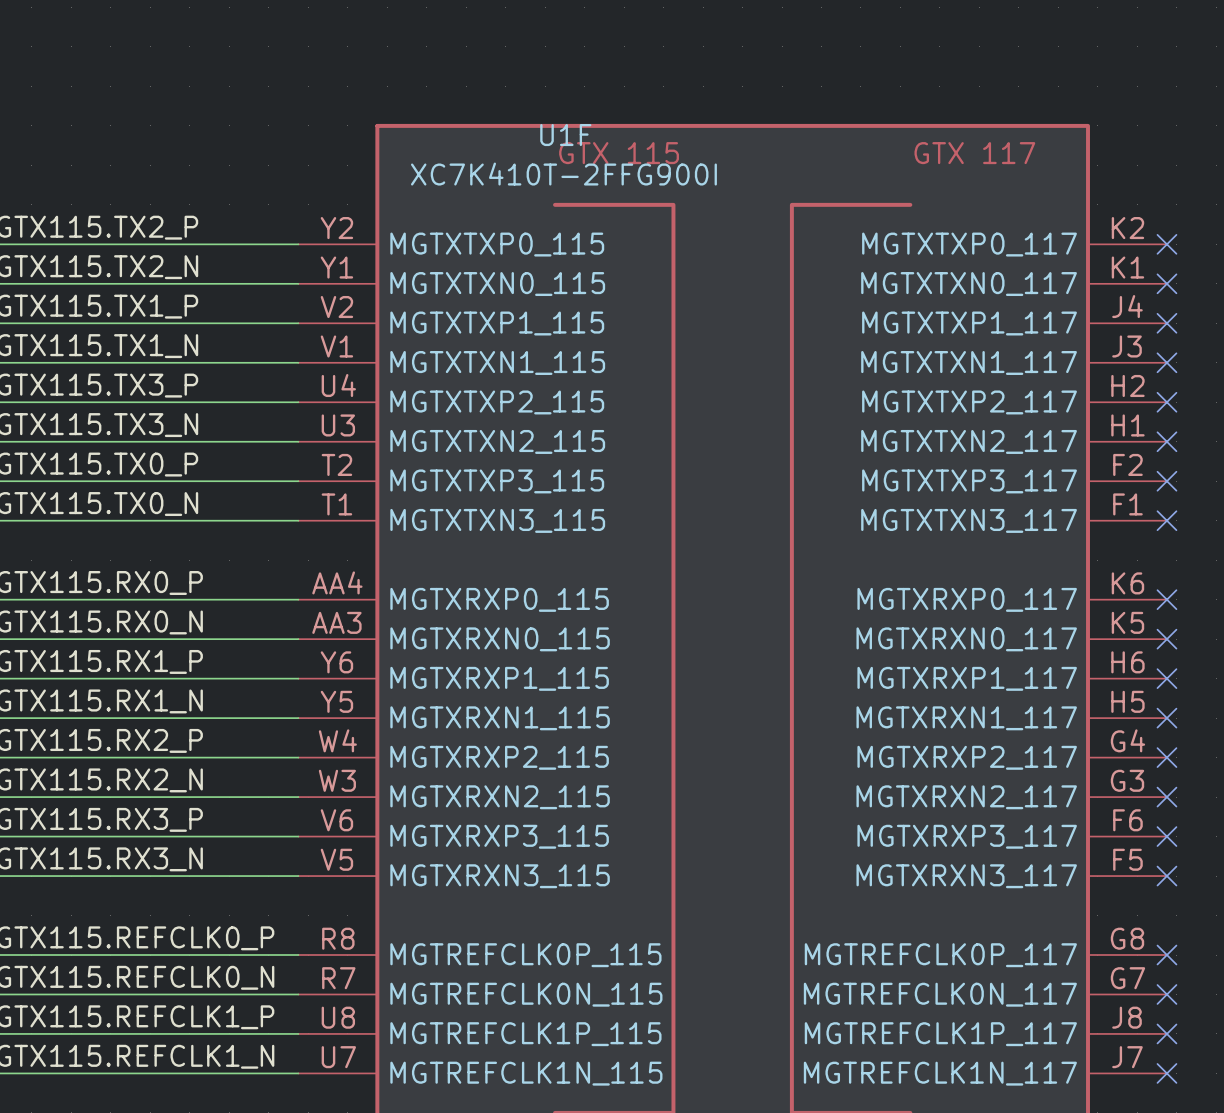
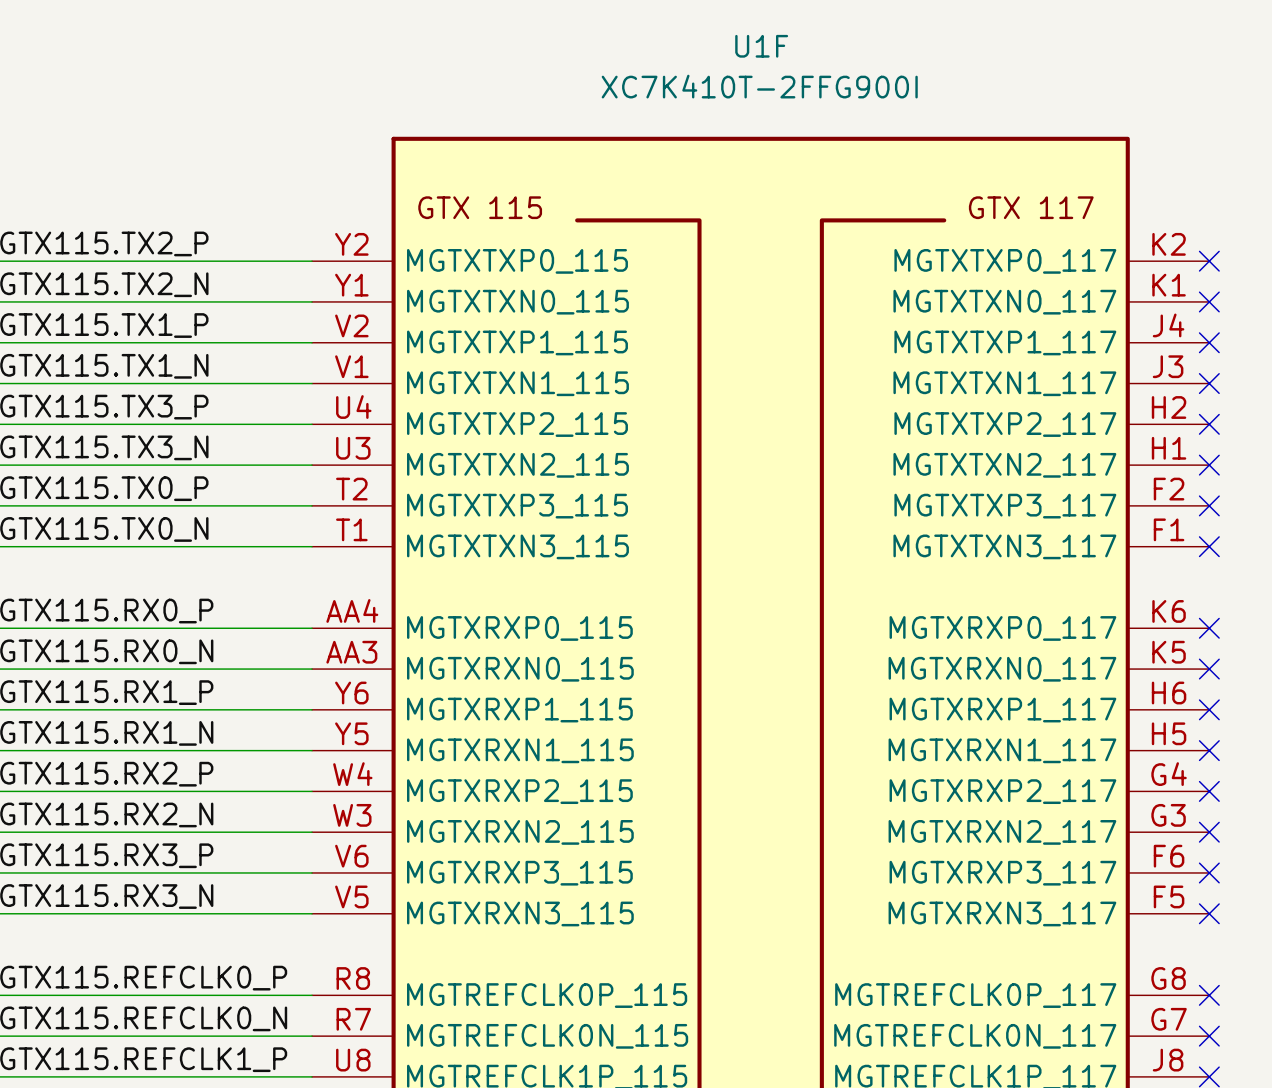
U1F name position: U1F (565, 135) -> U1F (761, 46)
U1F text position: GTX 115 (619, 153) -> GTX 115 (480, 207)
U1F text position: GTX 117 (974, 153) -> GTX 117 (1031, 207)
U1F value position: XC7K410T-2FFG900I (563, 174) -> XC7K410T-2FFG900I (759, 86)

